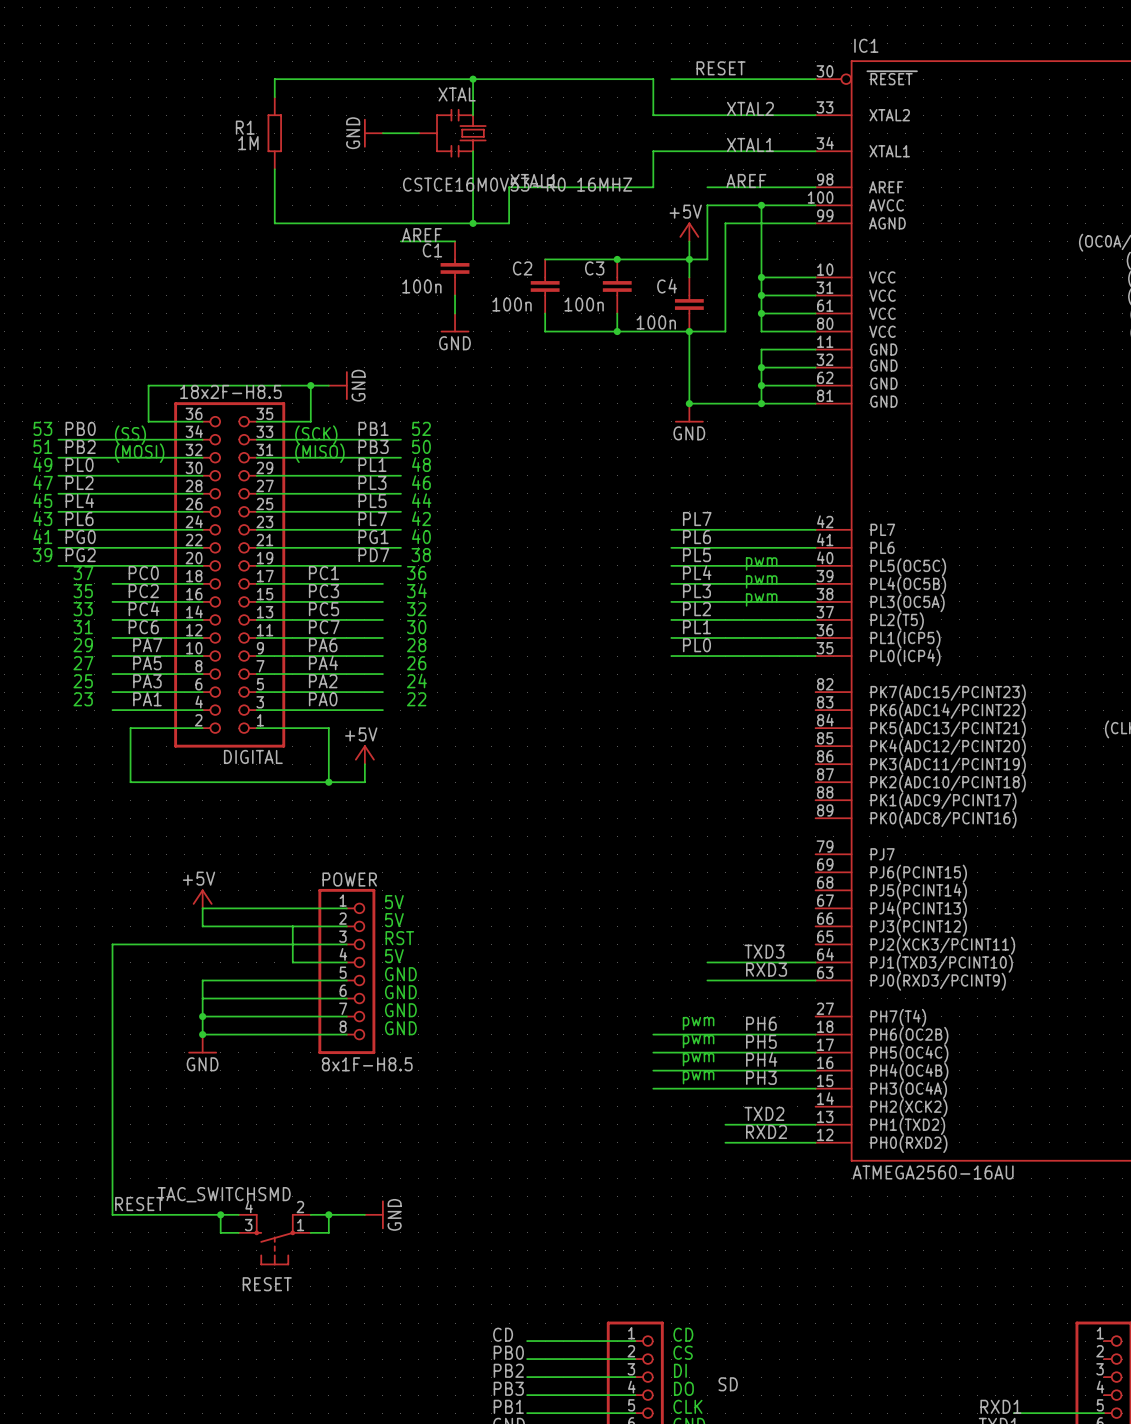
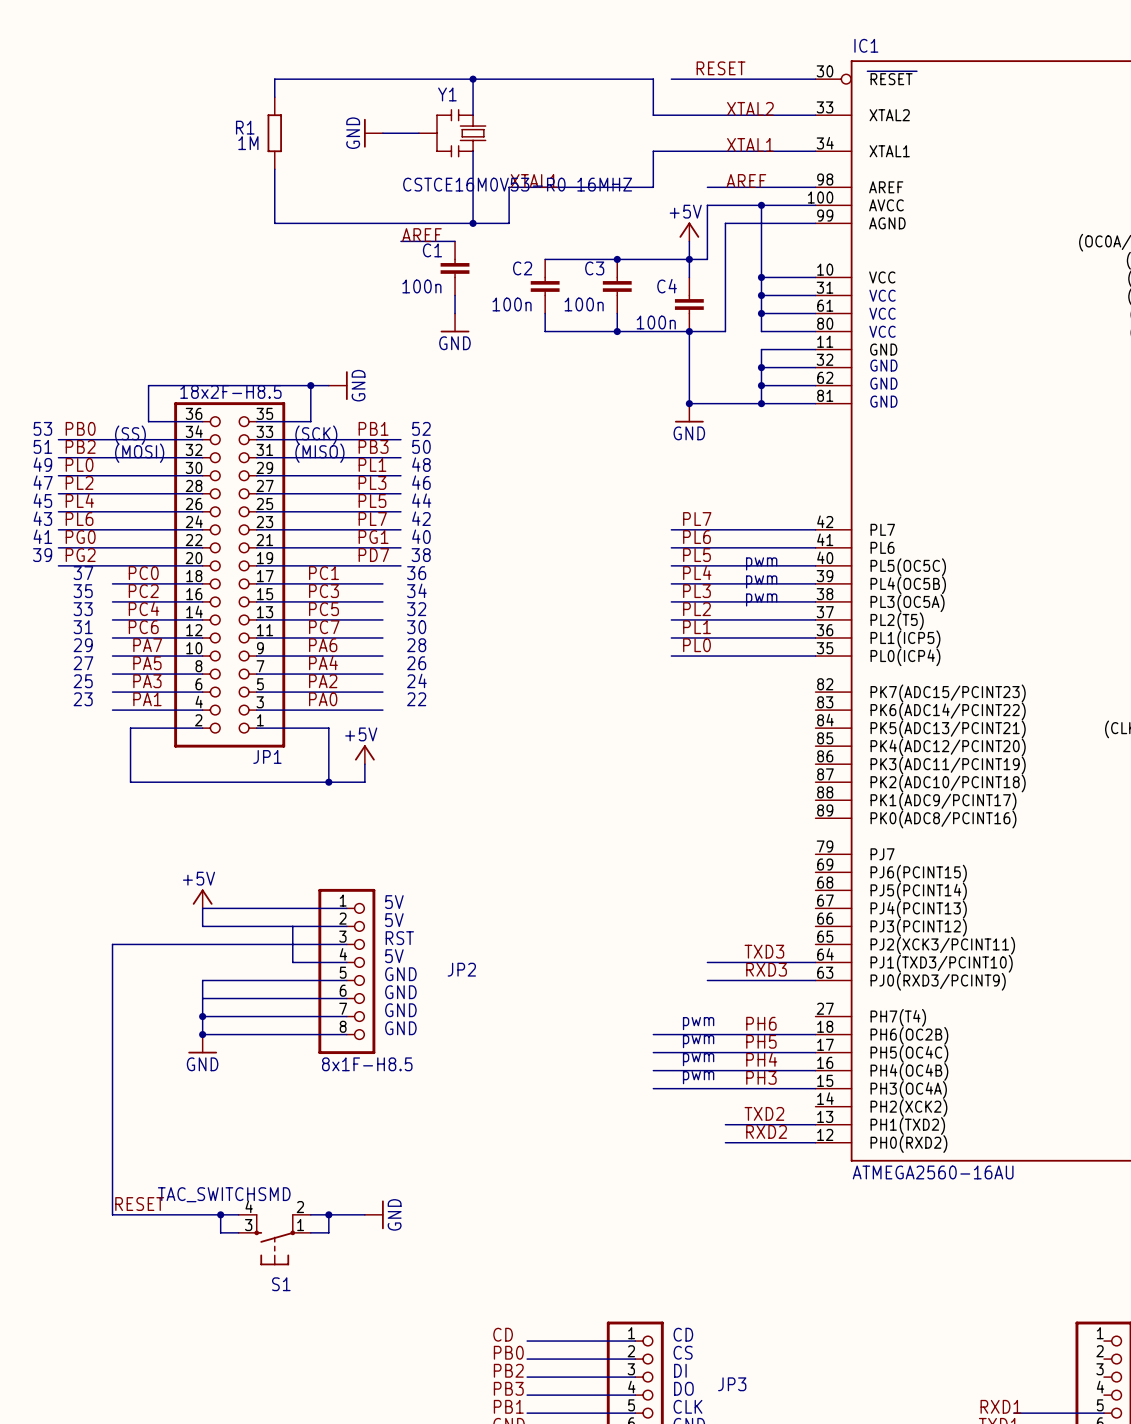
XTAL name: XTAL (457, 94) -> Y1 (447, 94)
DIGITAL name: DIGITAL (253, 756) -> JP1 (267, 756)
POWER name: POWER (349, 879) -> JP2 (461, 969)
RESET name: RESET (267, 1284) -> S1 (281, 1284)
SD name: SD (728, 1384) -> JP3 (732, 1384)

